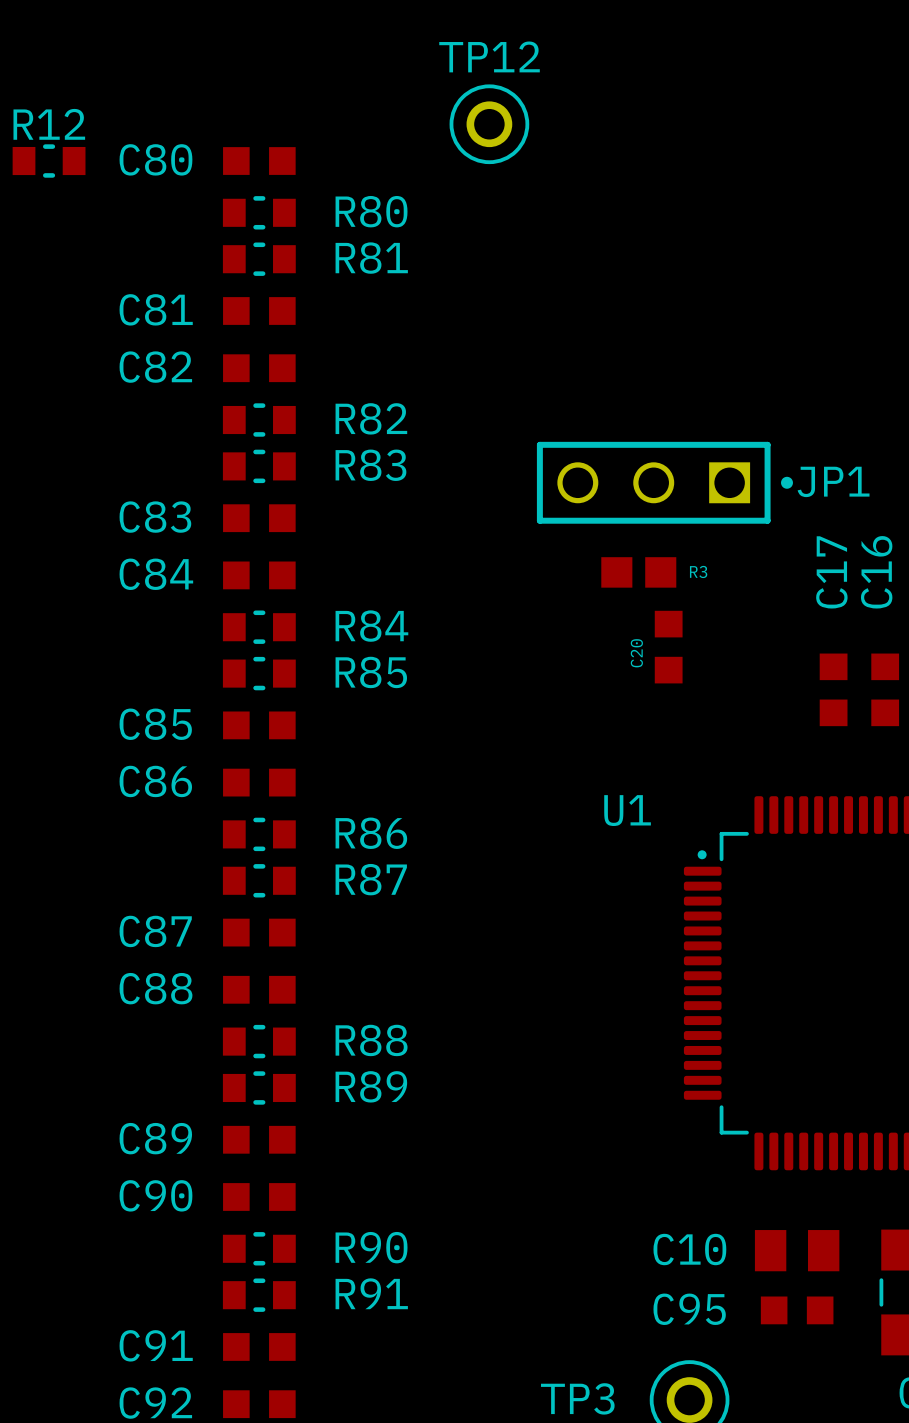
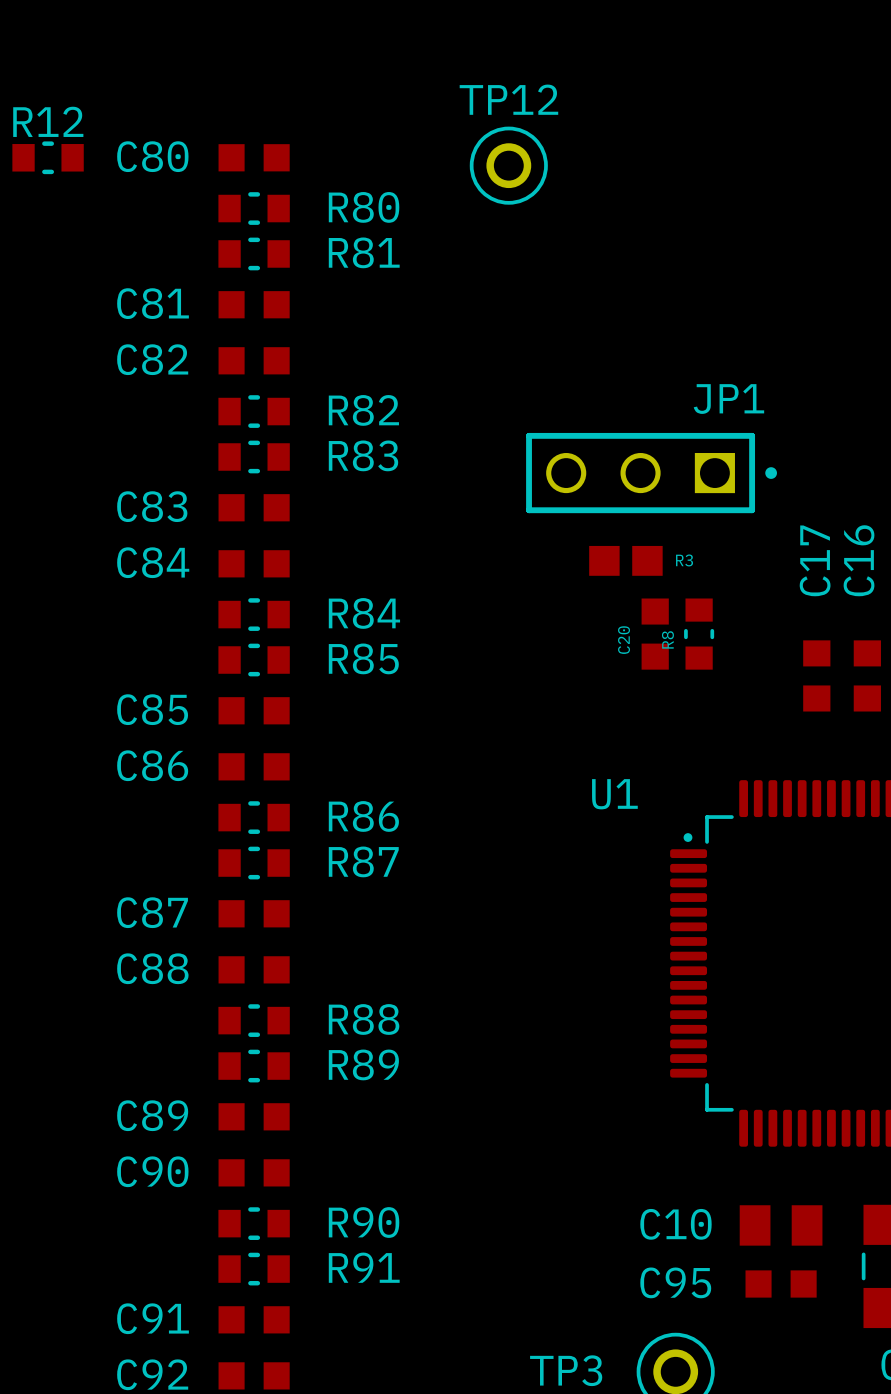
TP12 position: (489, 124) -> (508, 165)
JP1 name position: JP1 (833, 481) -> JP1 (728, 399)
R8: none -> (699, 634)

